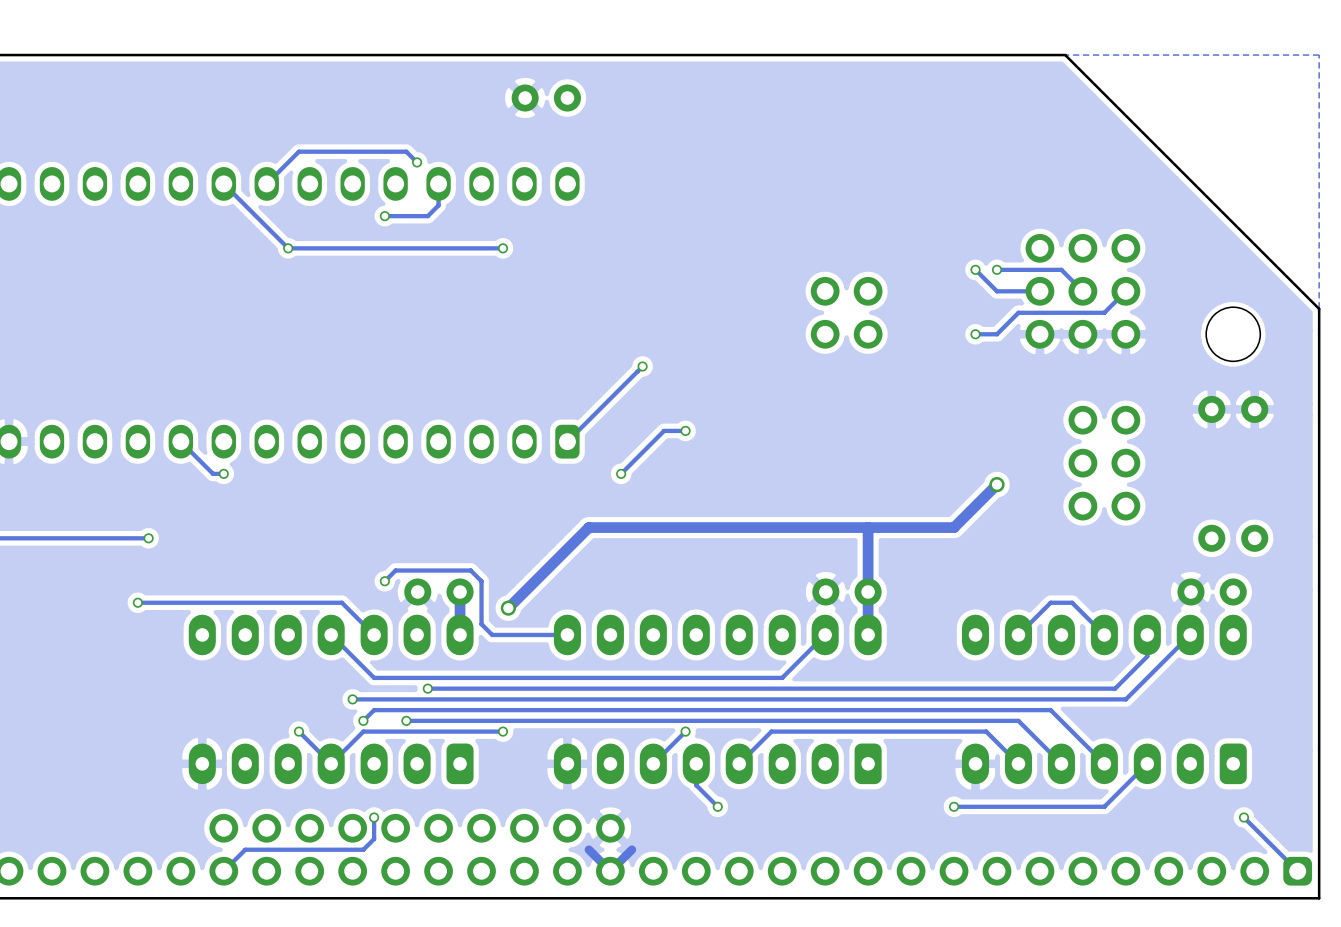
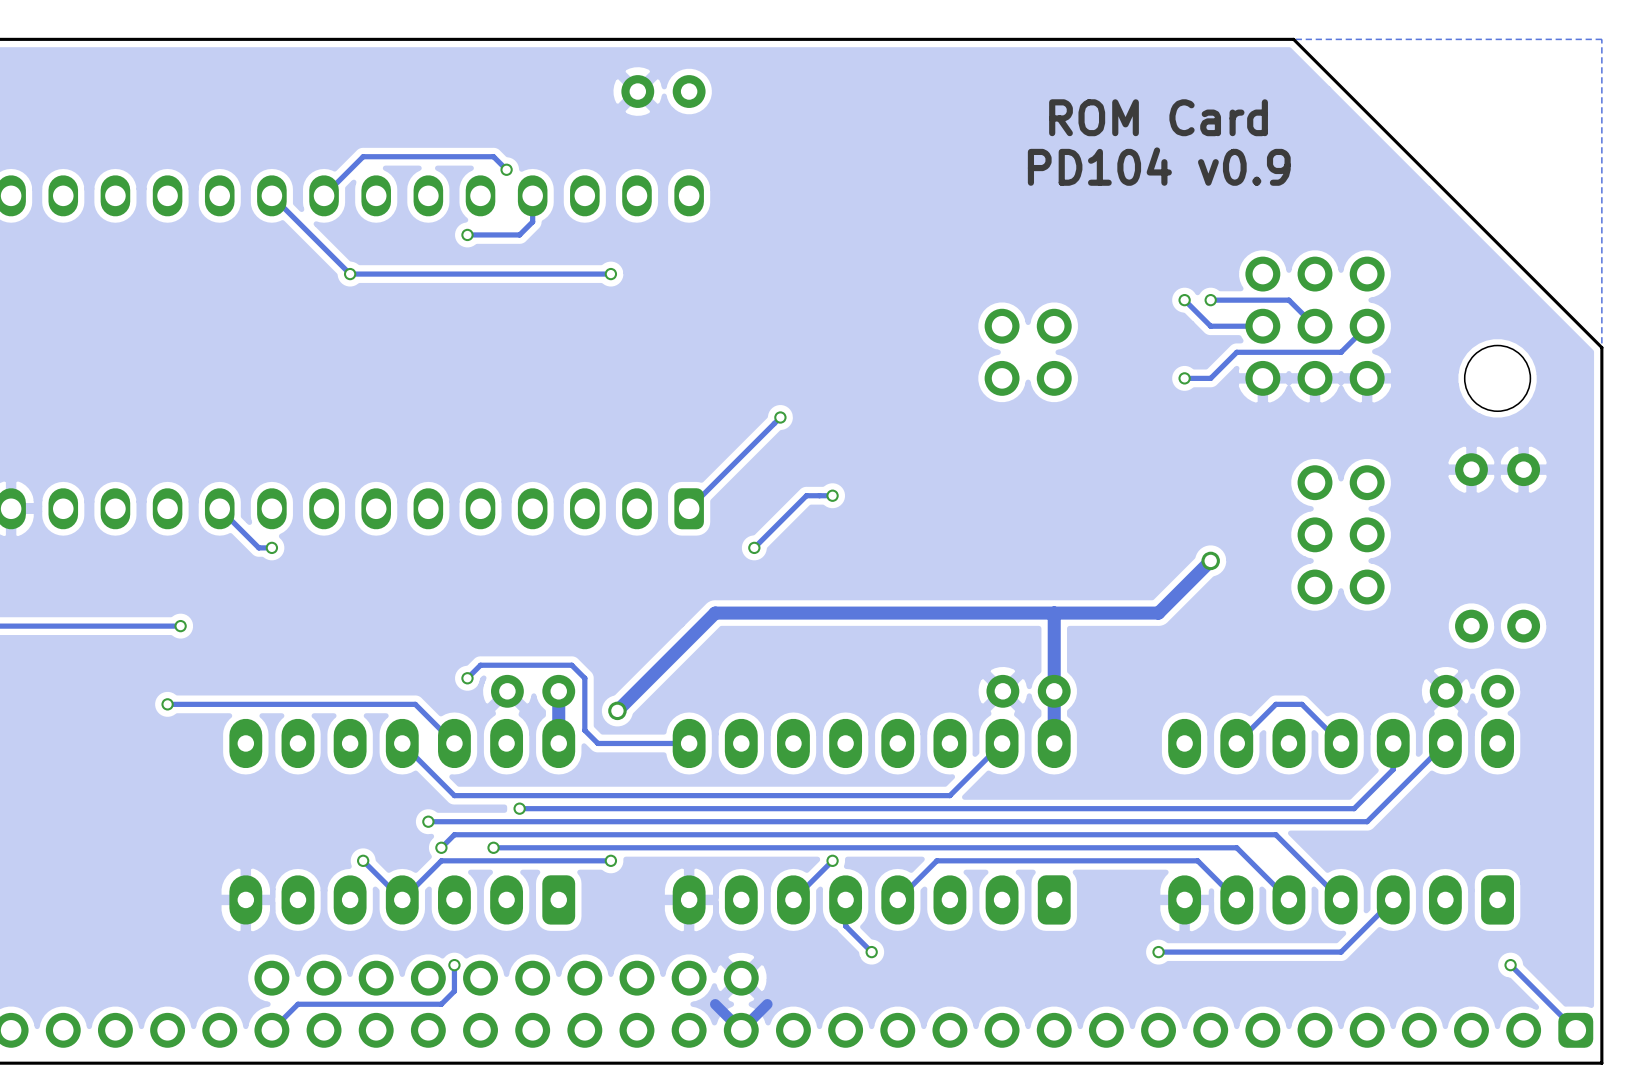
text: none -> ROM Card (1158, 117)
text: none -> PD104 v0.9 (1159, 166)

